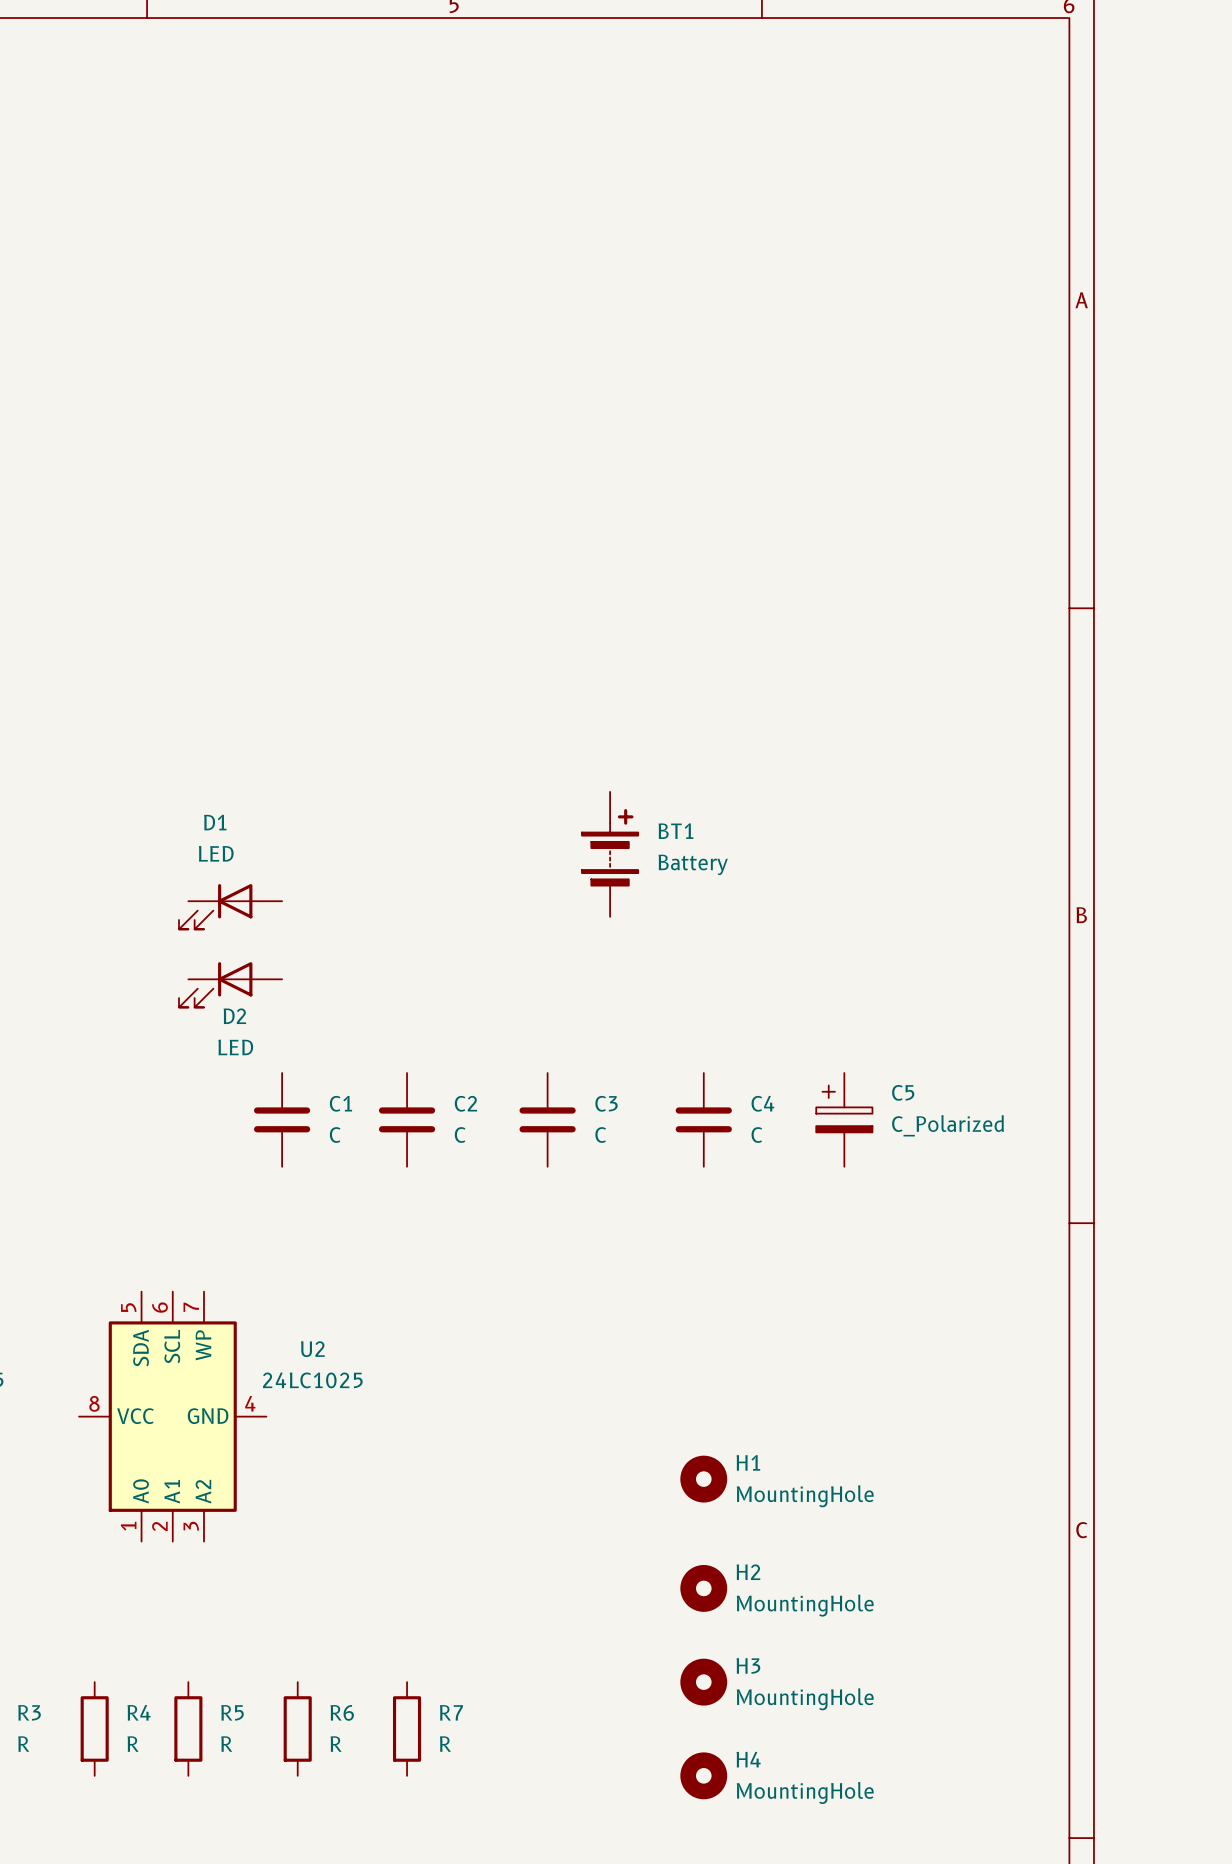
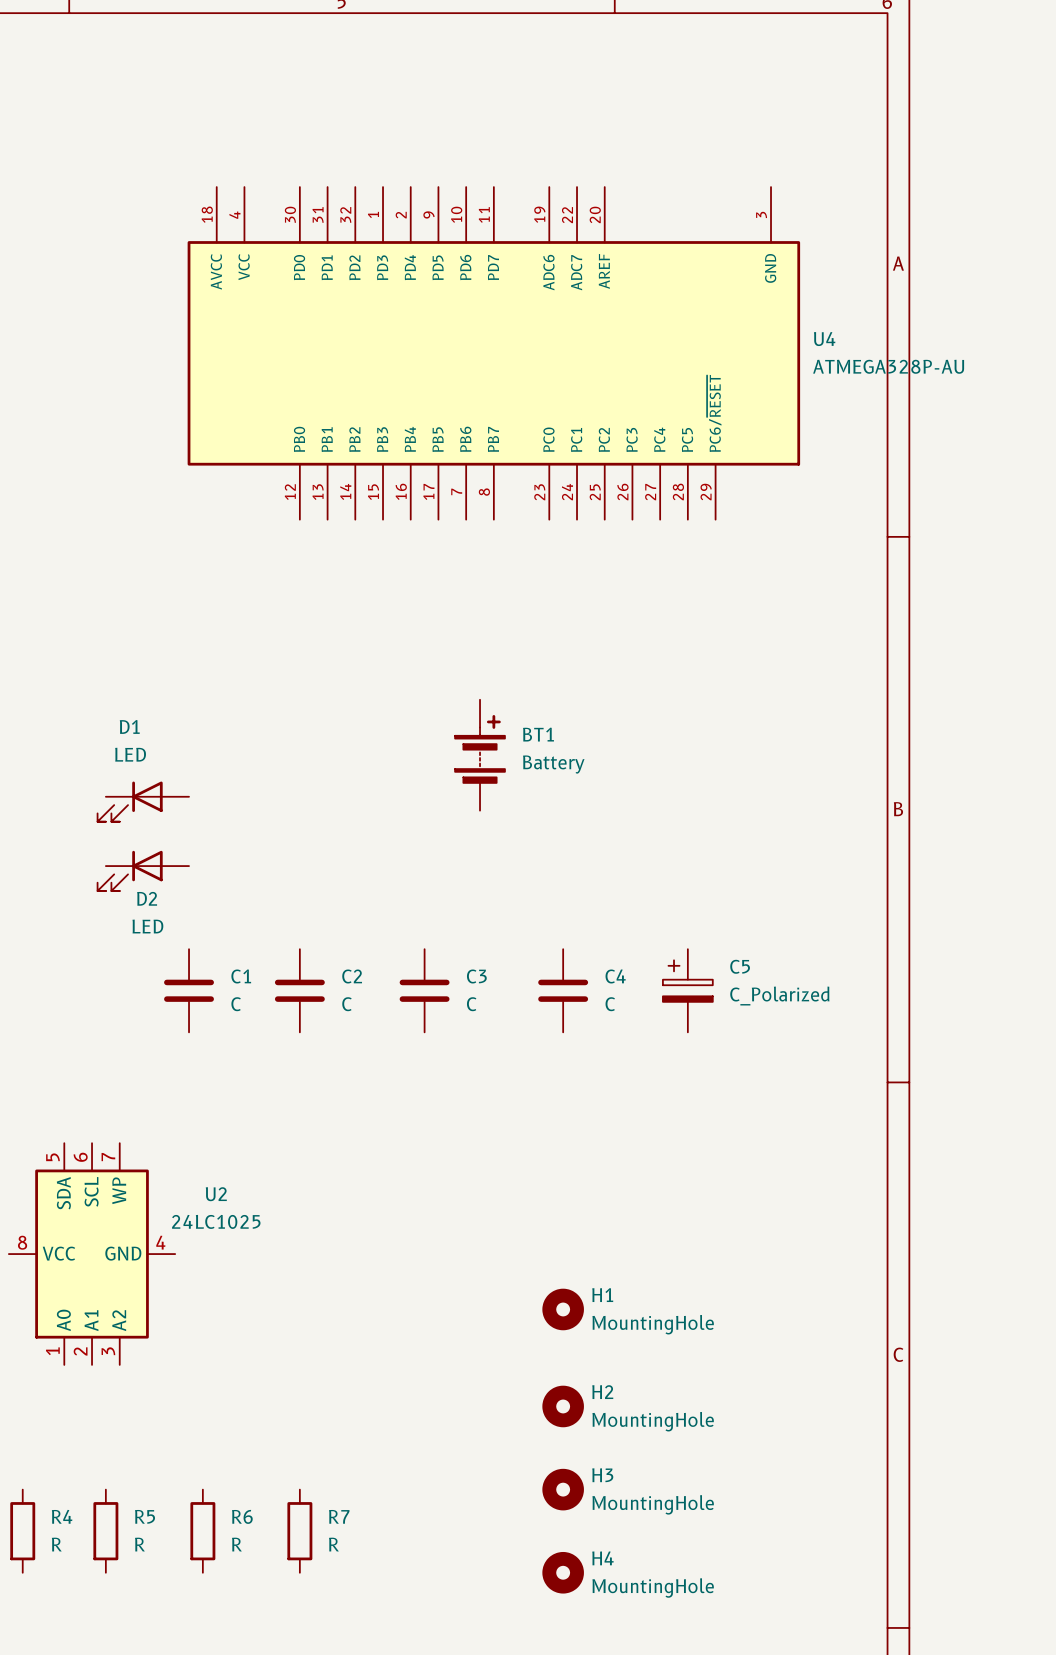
U4: none -> ATMEGA328P-AU (493, 353)

